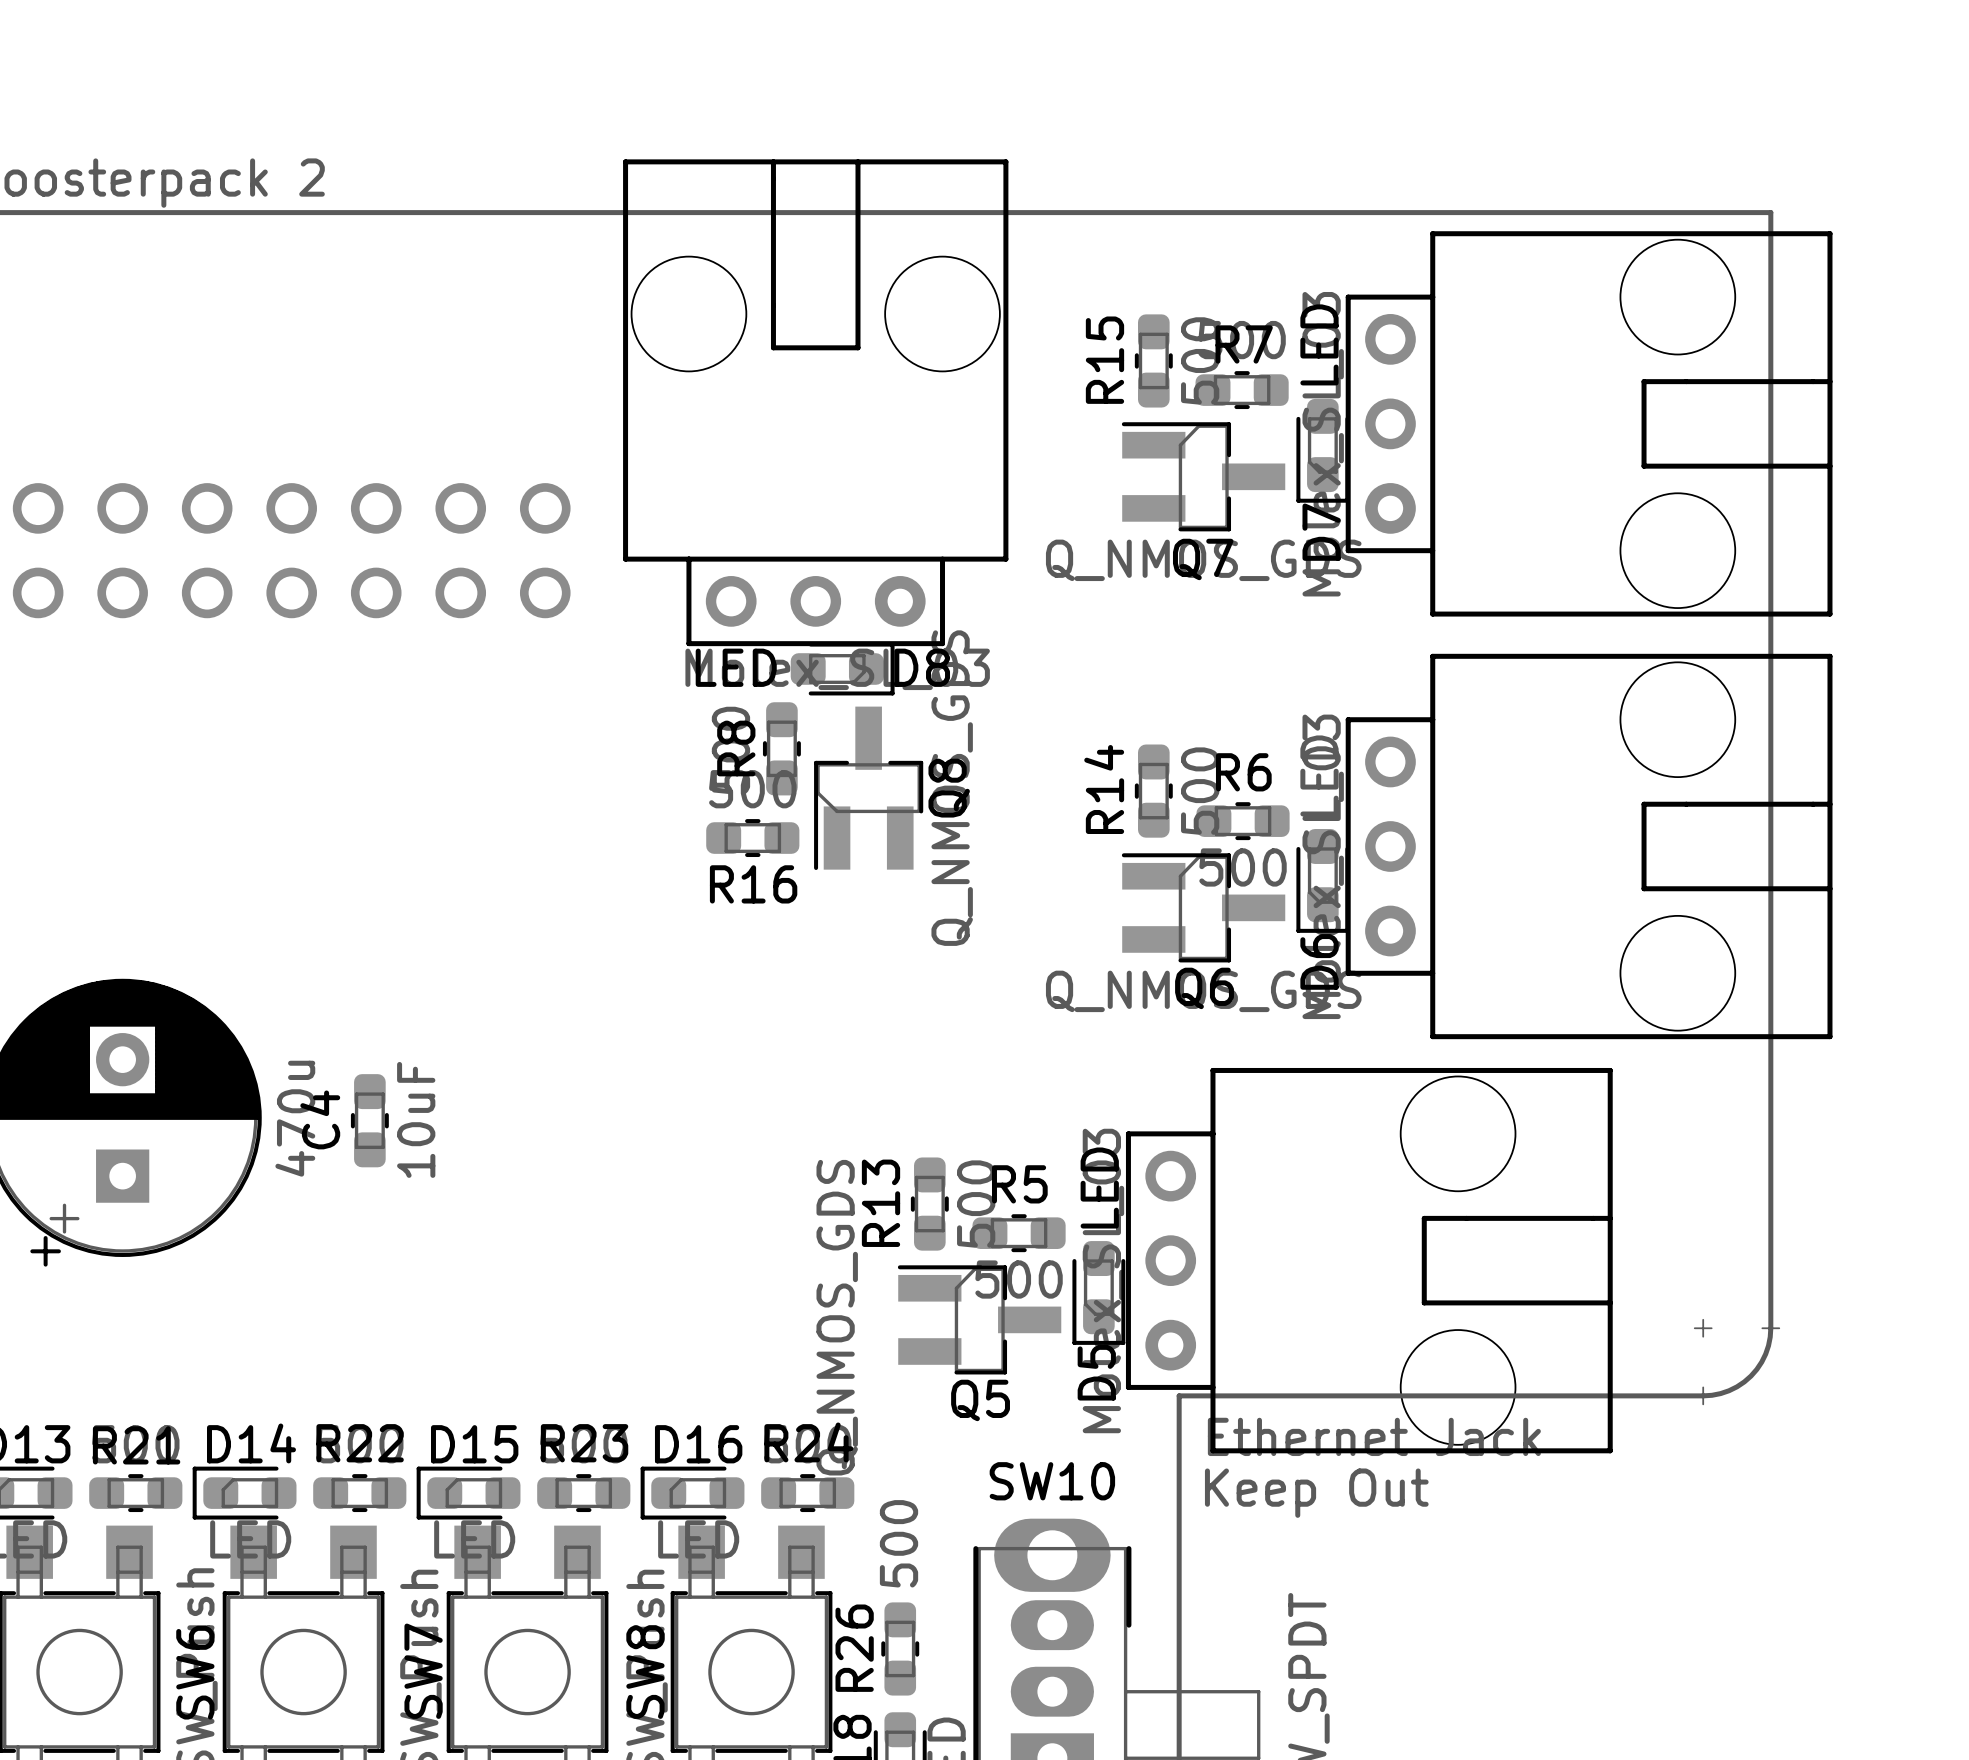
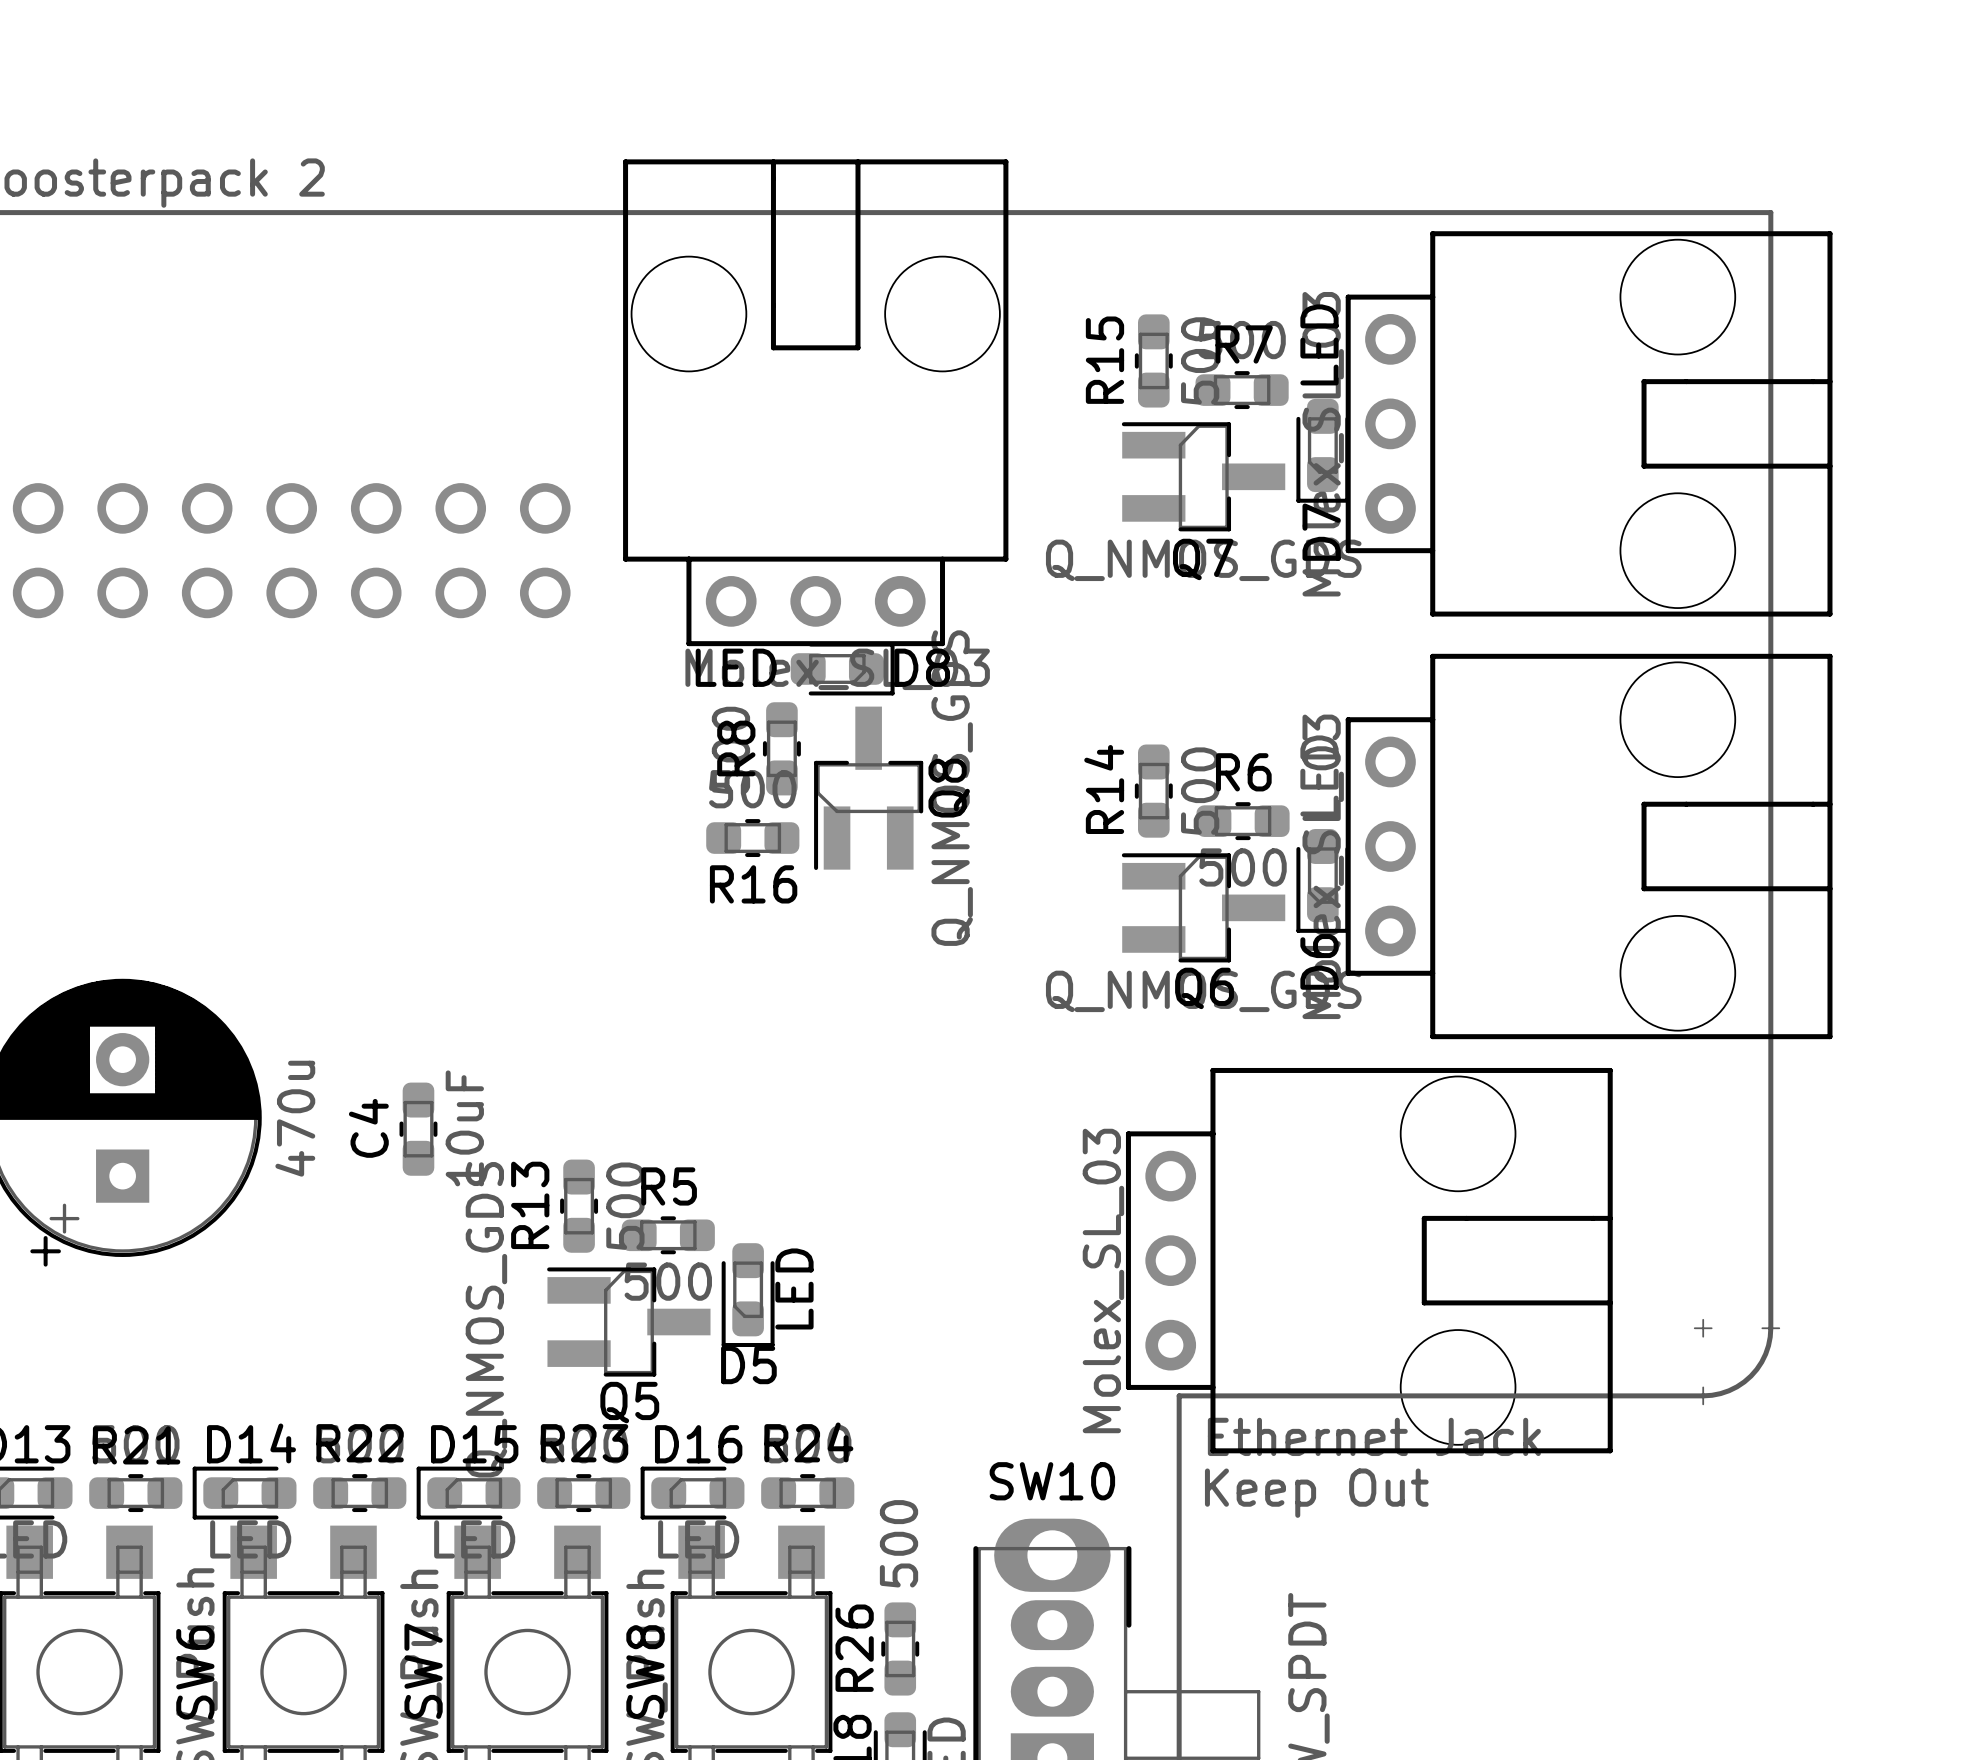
C4 position: (369, 1120) -> (418, 1129)
D5 value position: LED (1099, 1188) -> LED (794, 1288)
R13 position: (929, 1204) -> (579, 1206)
R5 position: (1019, 1233) -> (668, 1235)
D5 position: (1098, 1292) -> (748, 1295)
Q5 position: (979, 1319) -> (628, 1322)
D5 name rotation: 0° (1096, 1372) -> 90° clockwise (748, 1365)

